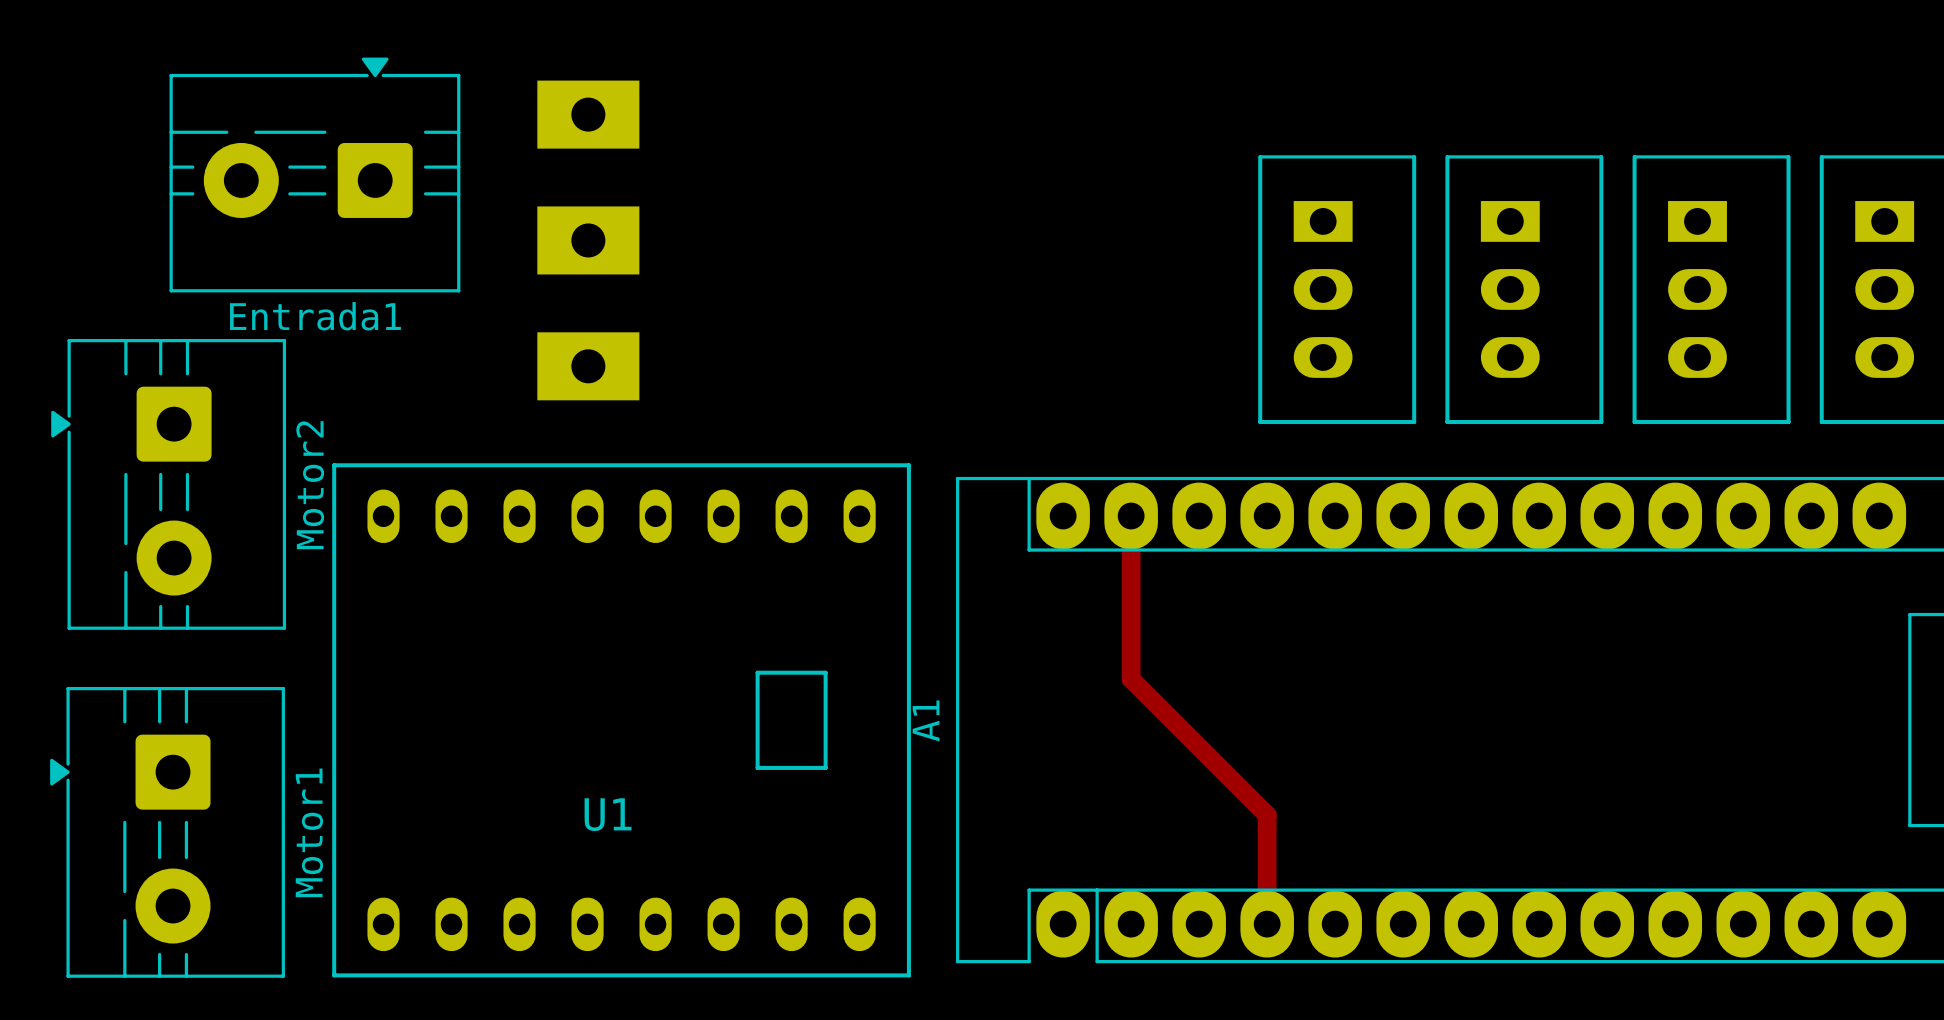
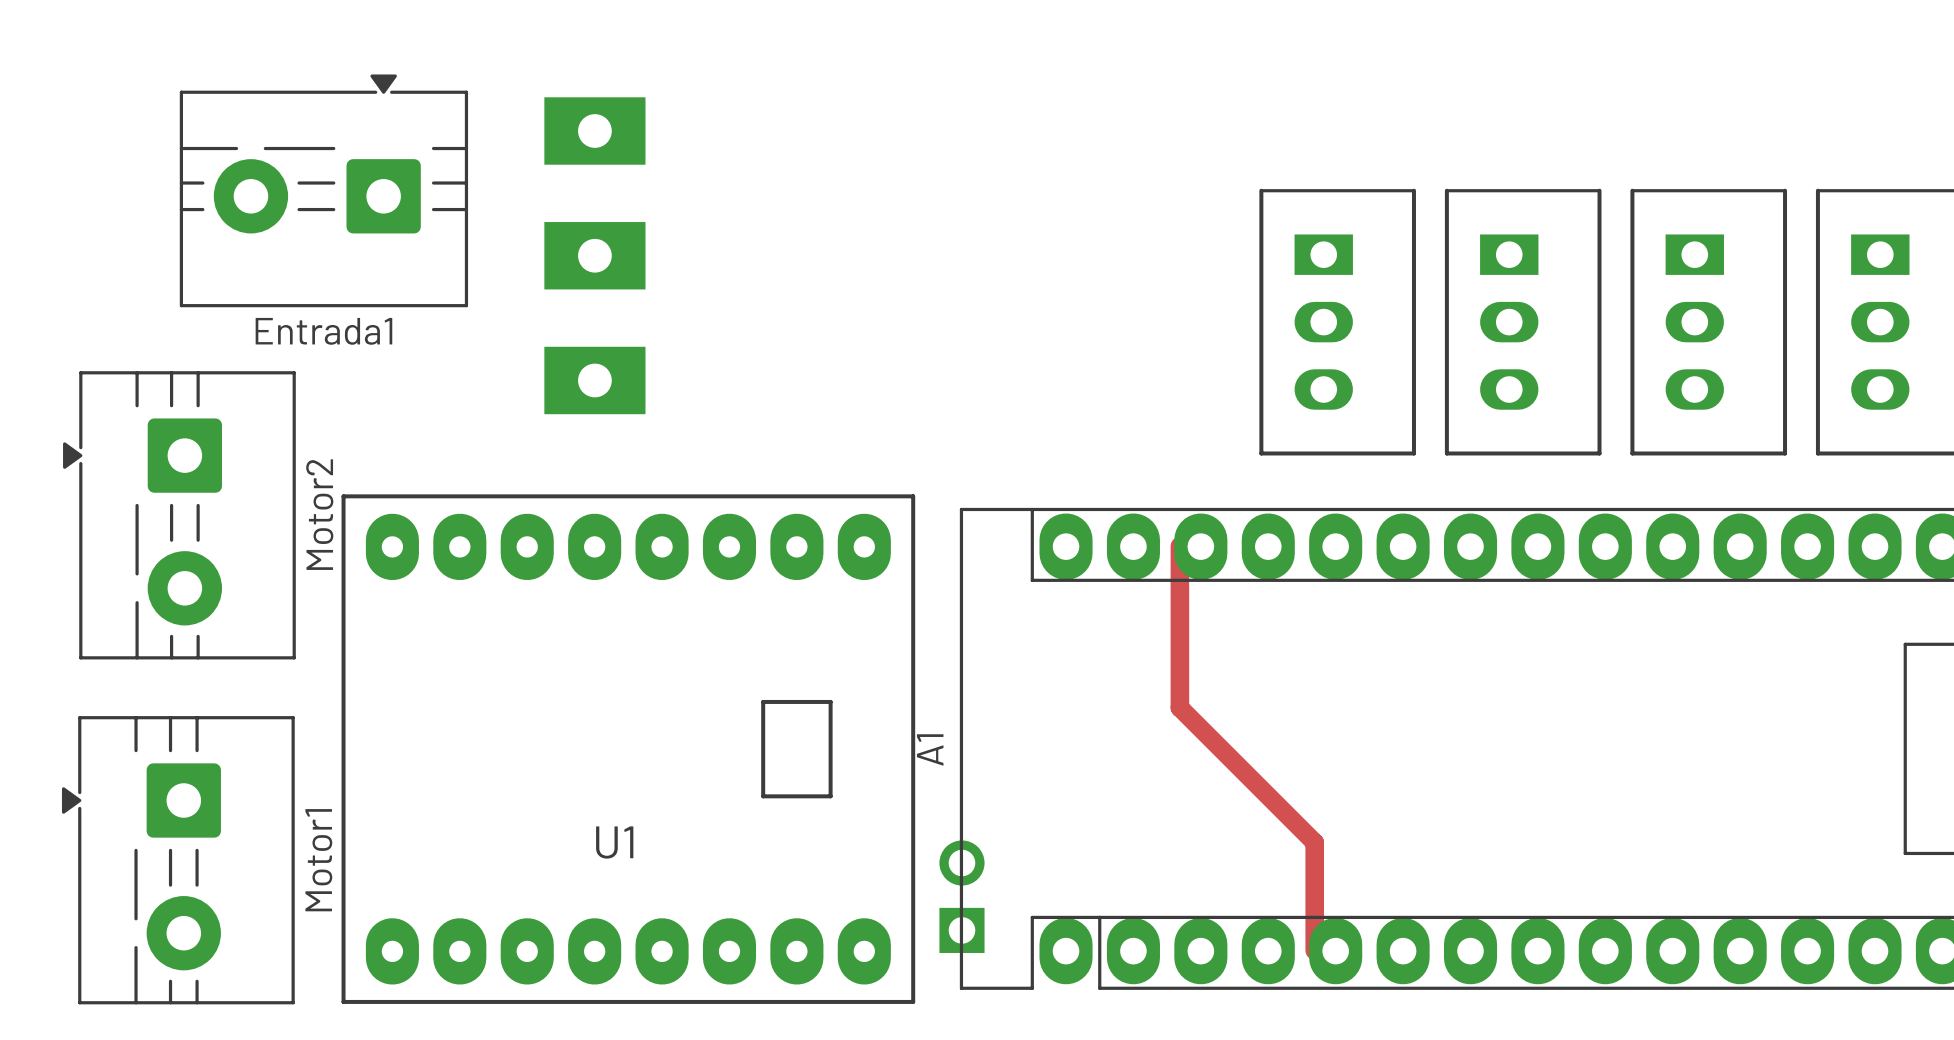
Entrada1 position: (314, 174) -> (323, 190)
part position: (588, 240) -> (594, 255)
U1 footprint: [332, 463, 911, 978] -> [341, 494, 916, 1004]
track: (1131, 516) (1131, 679) (1267, 815) (1267, 924) -> (1179, 546) (1179, 707) (1314, 842) (1314, 950)
part: none -> (961, 896)

